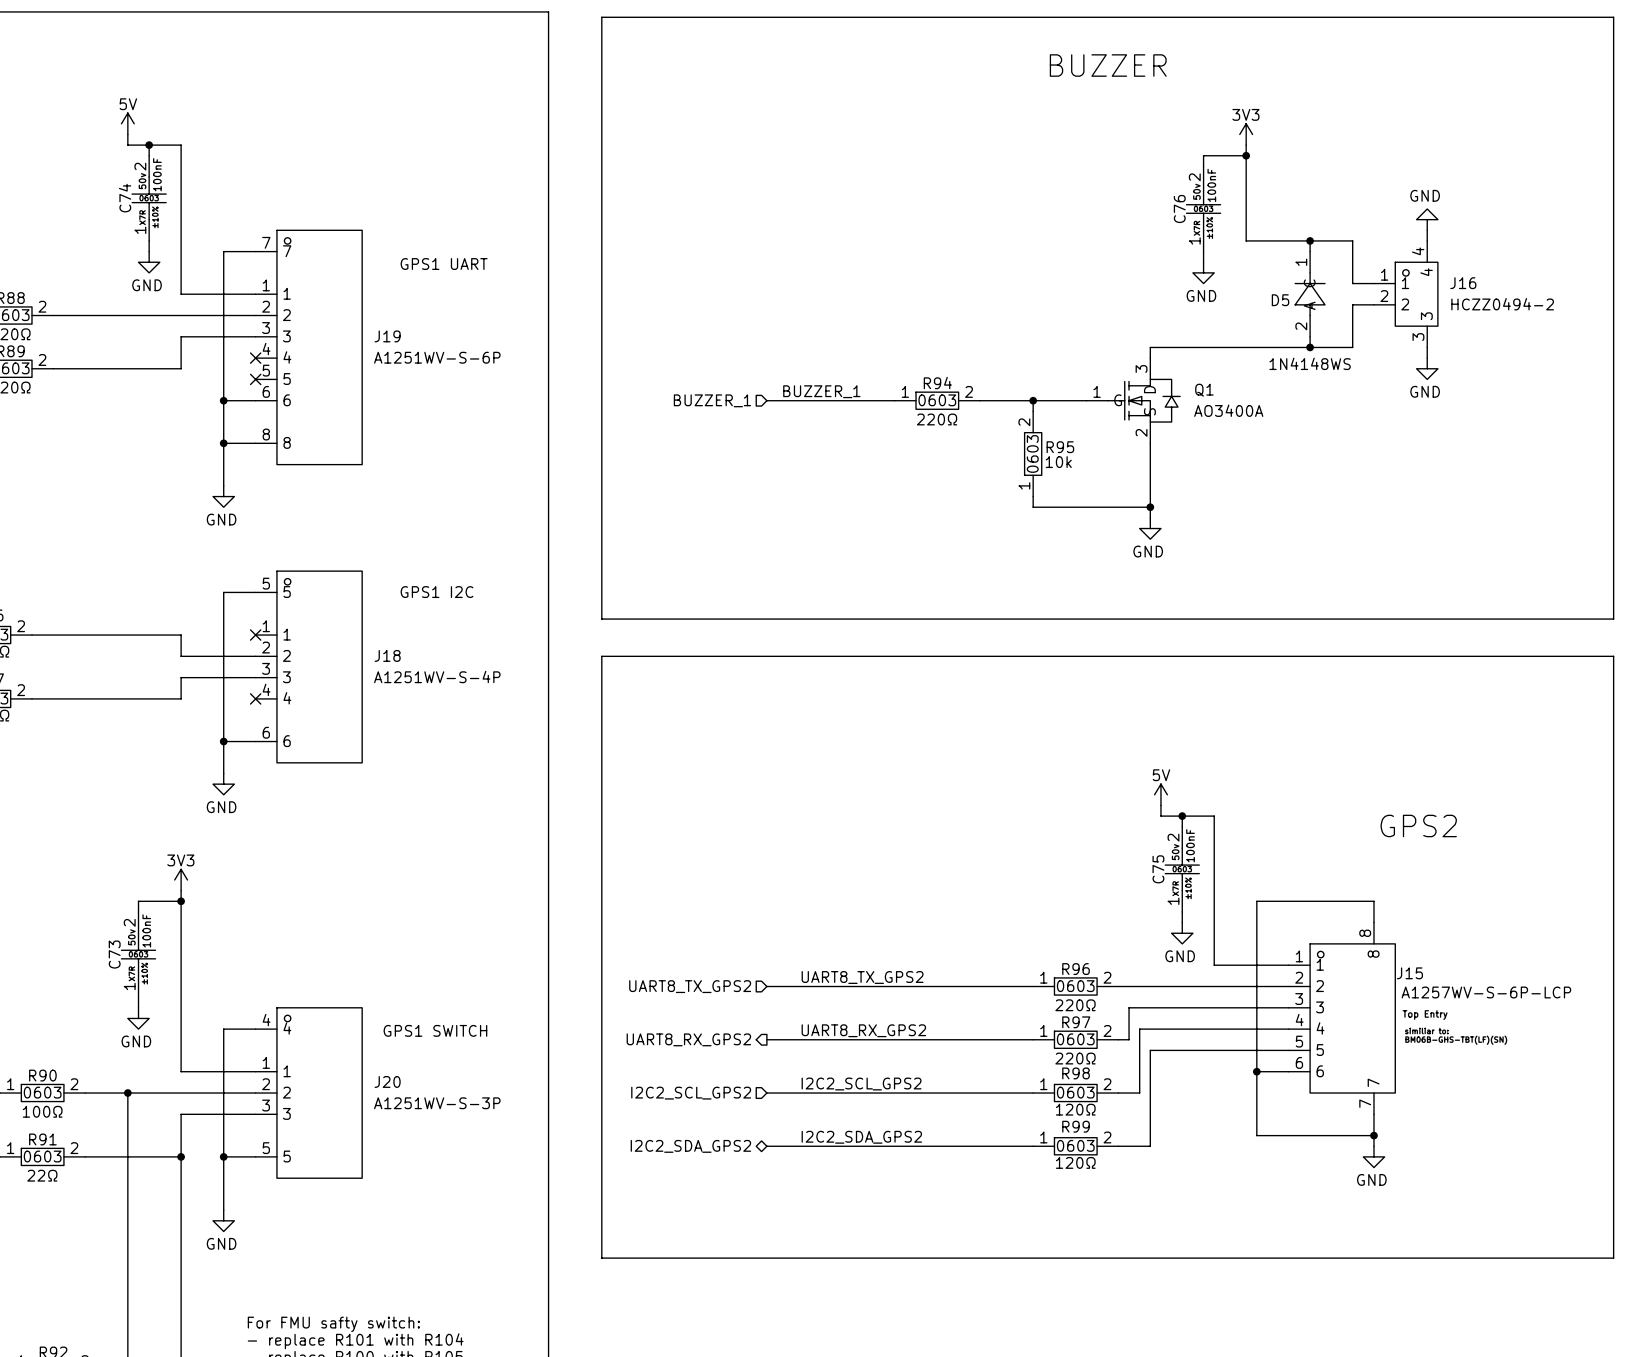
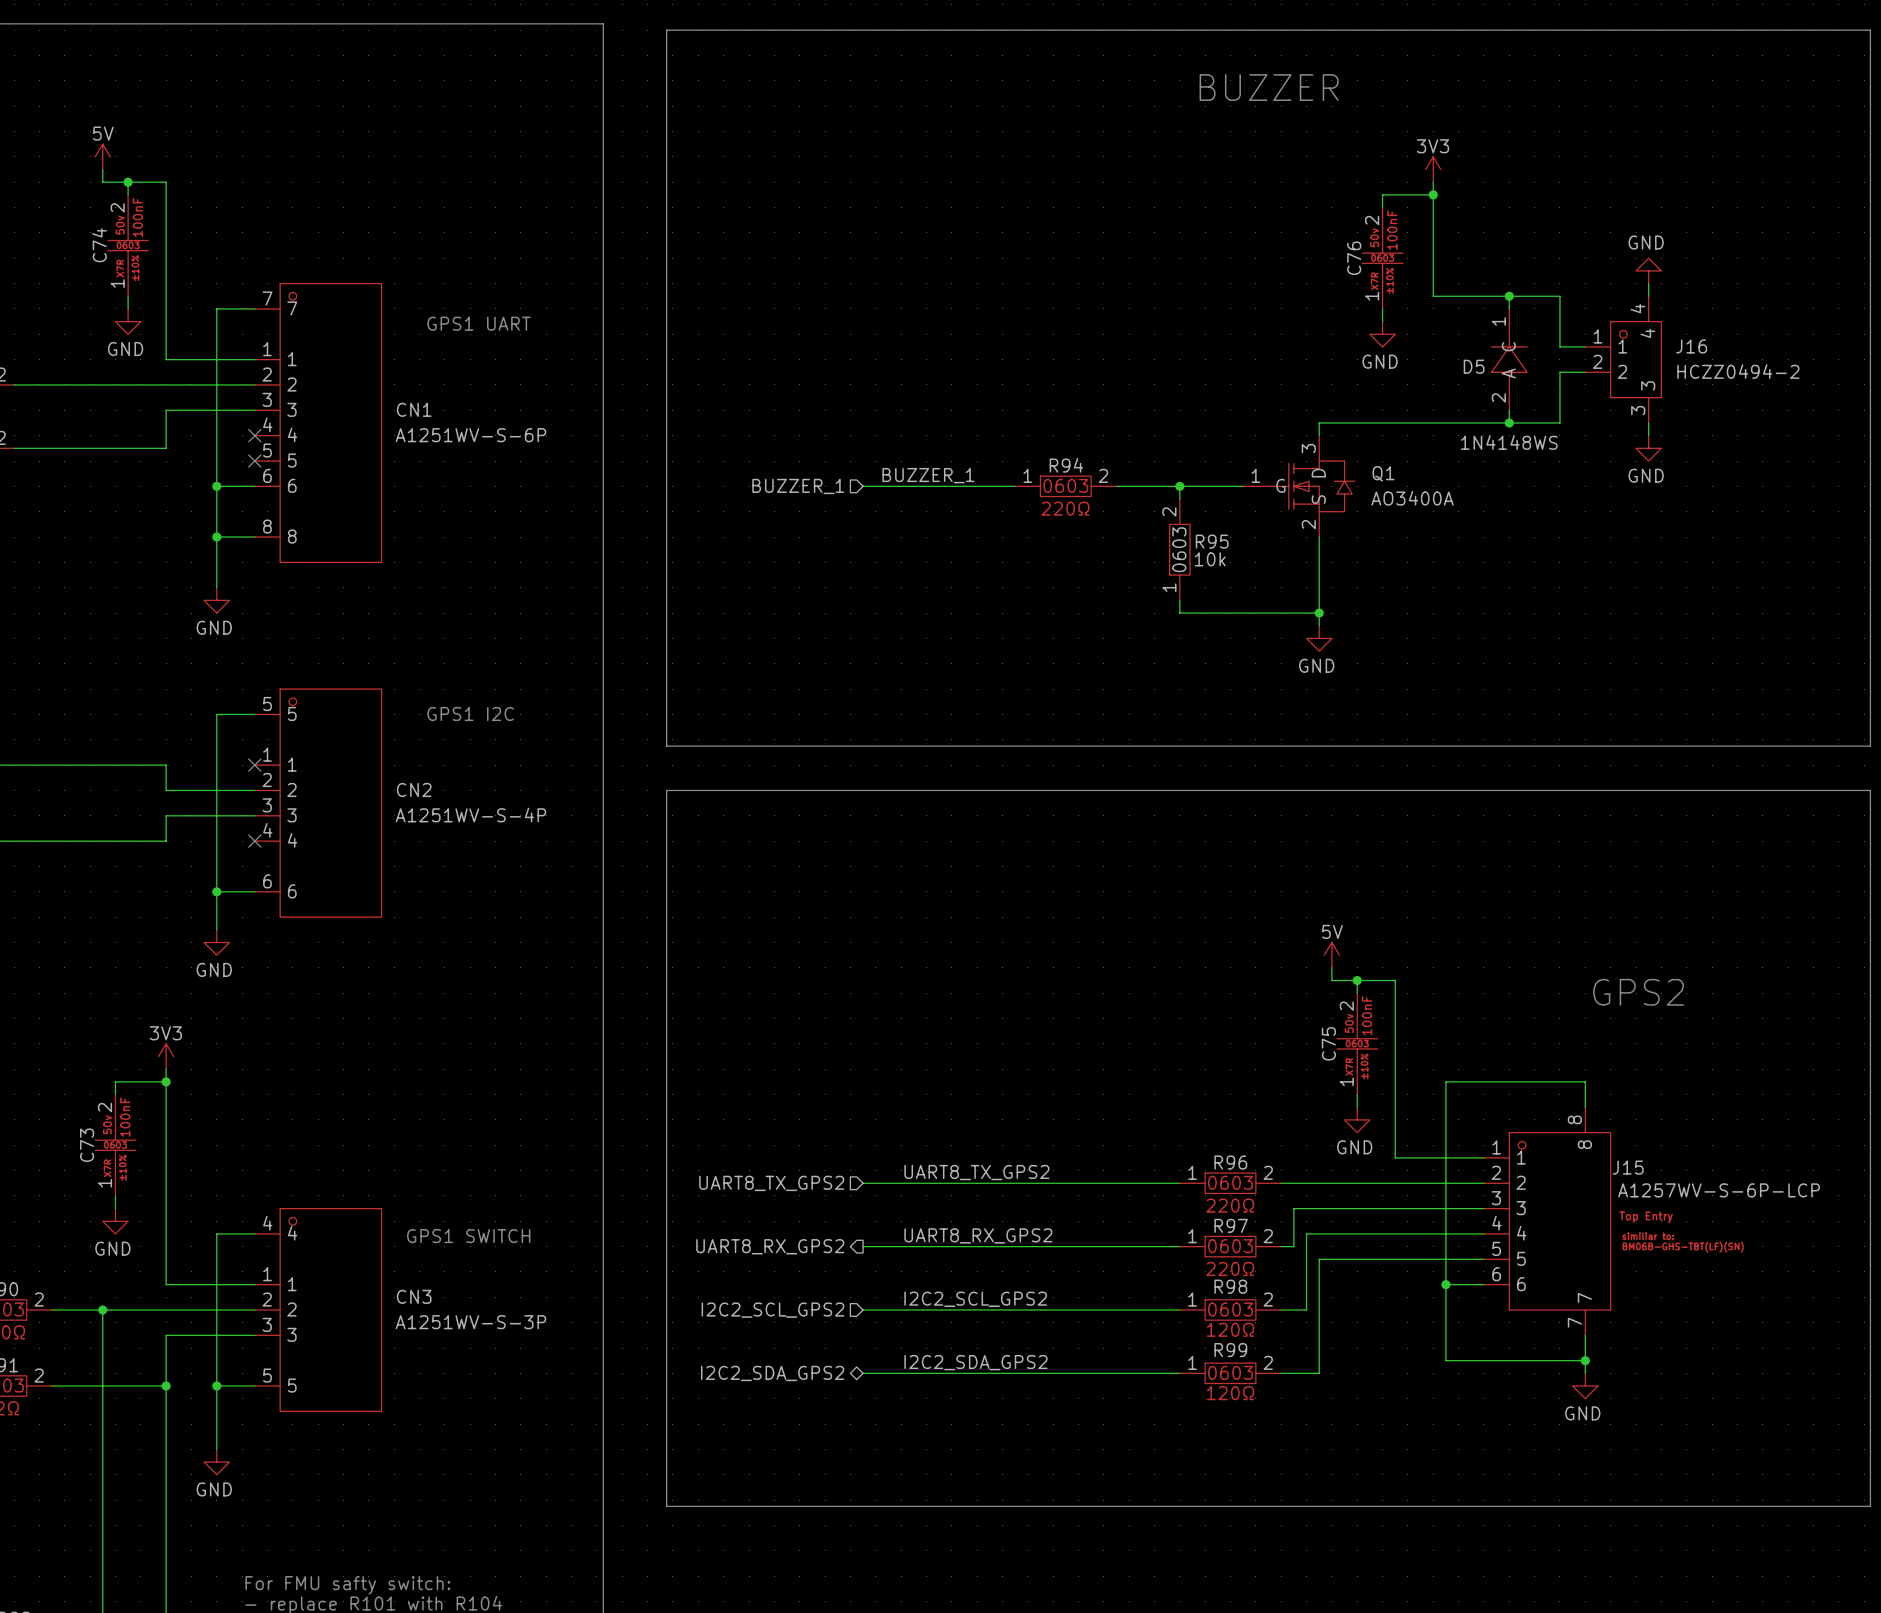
J19 name: J19 (387, 336) -> CN1 (414, 409)
J18 name: J18 (387, 655) -> CN2 (414, 789)
J20 name: J20 (387, 1081) -> CN3 (414, 1296)

